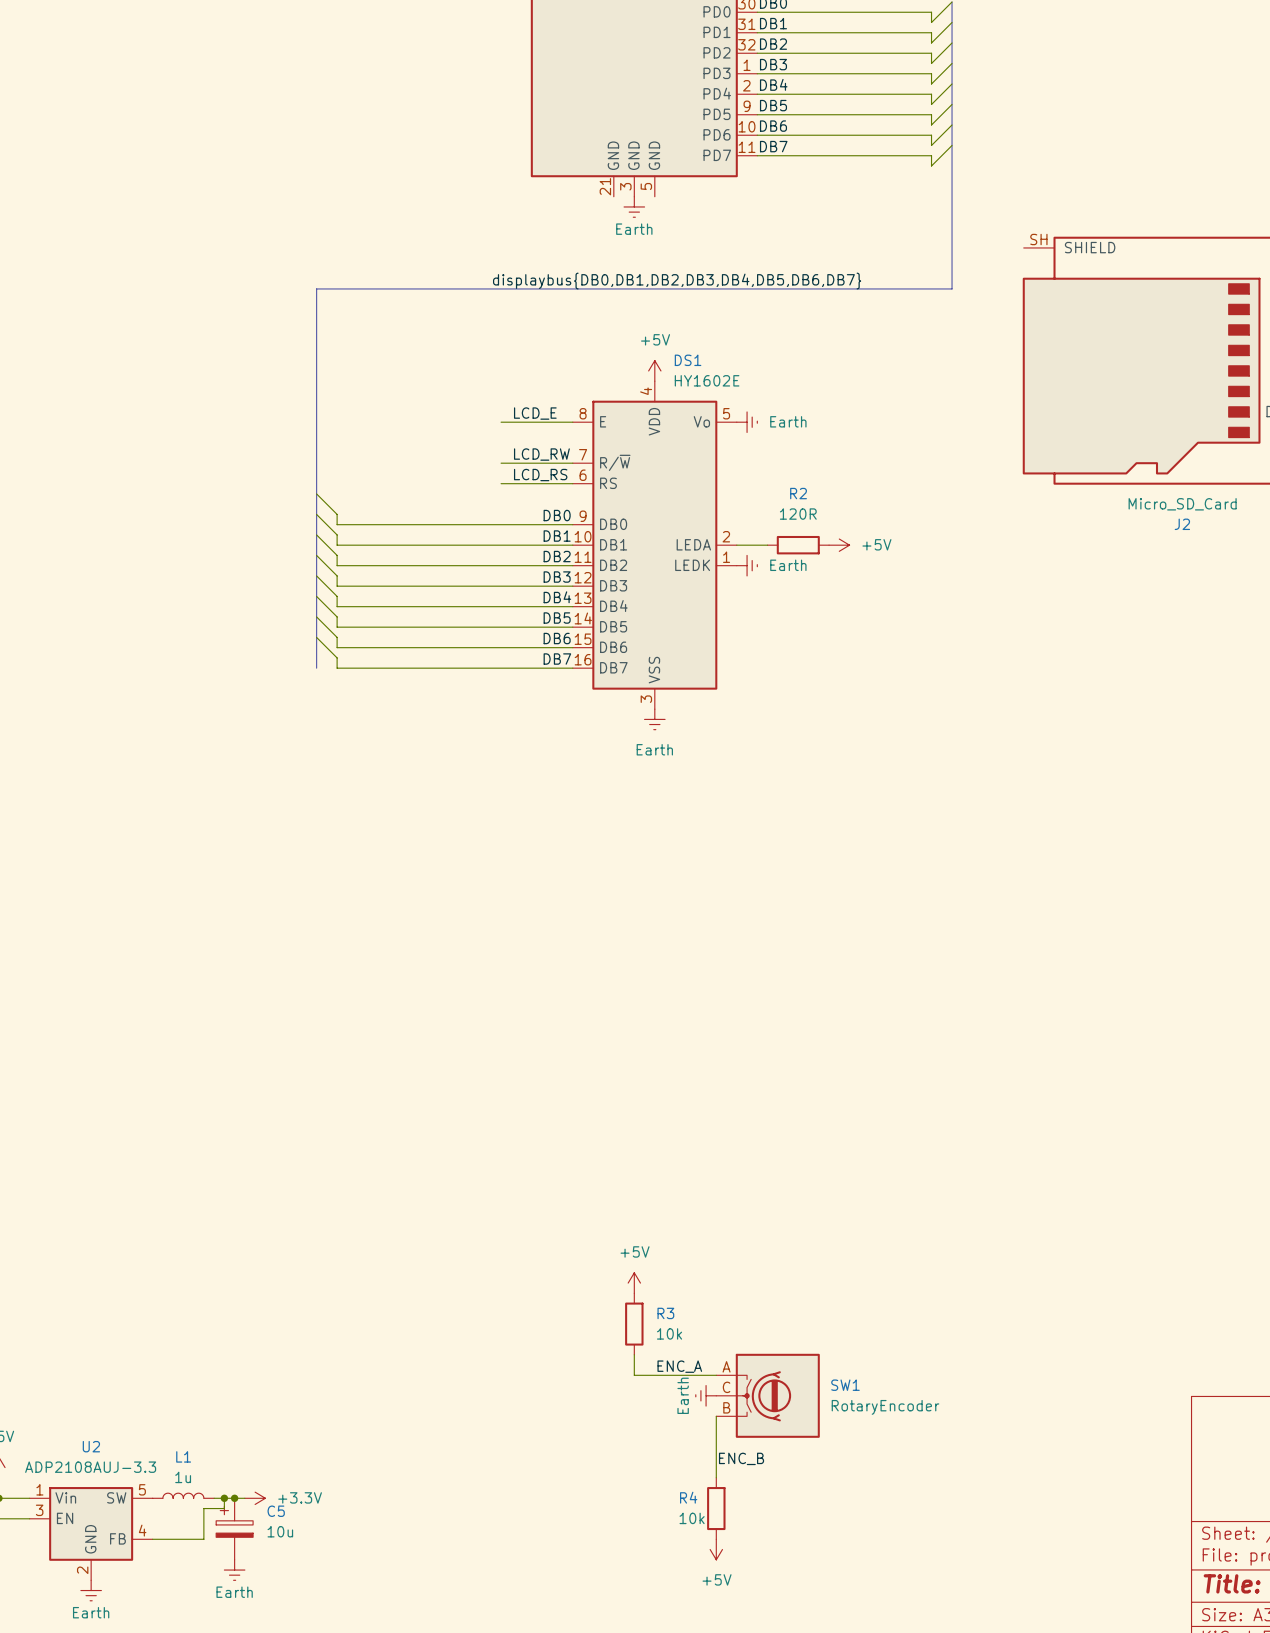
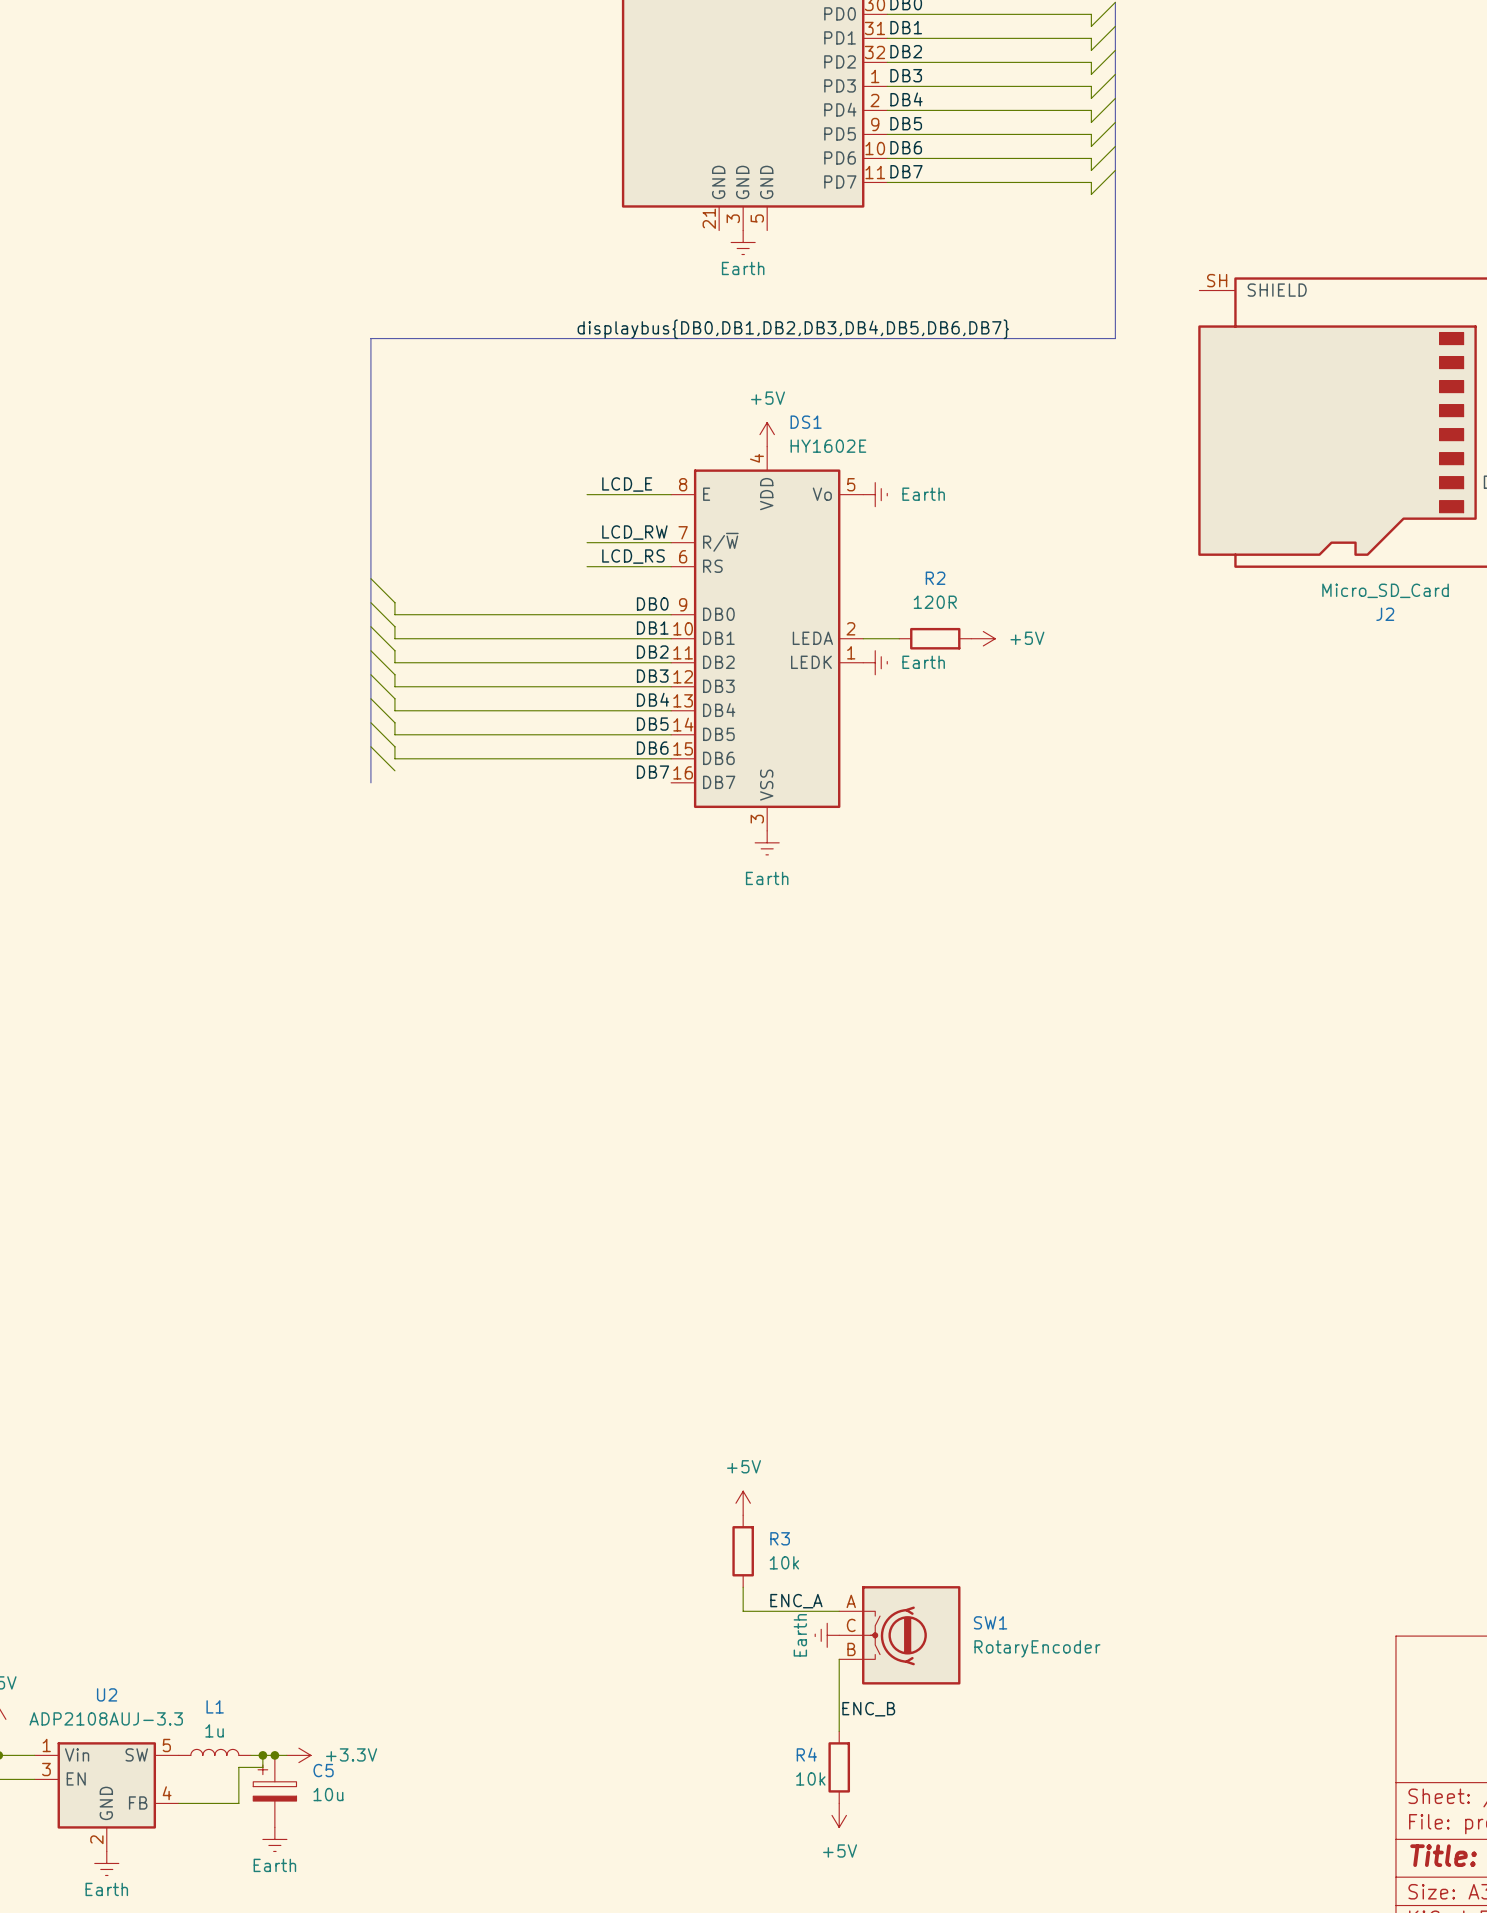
wire: (337, 657) (337, 668) (572, 668) -> none

